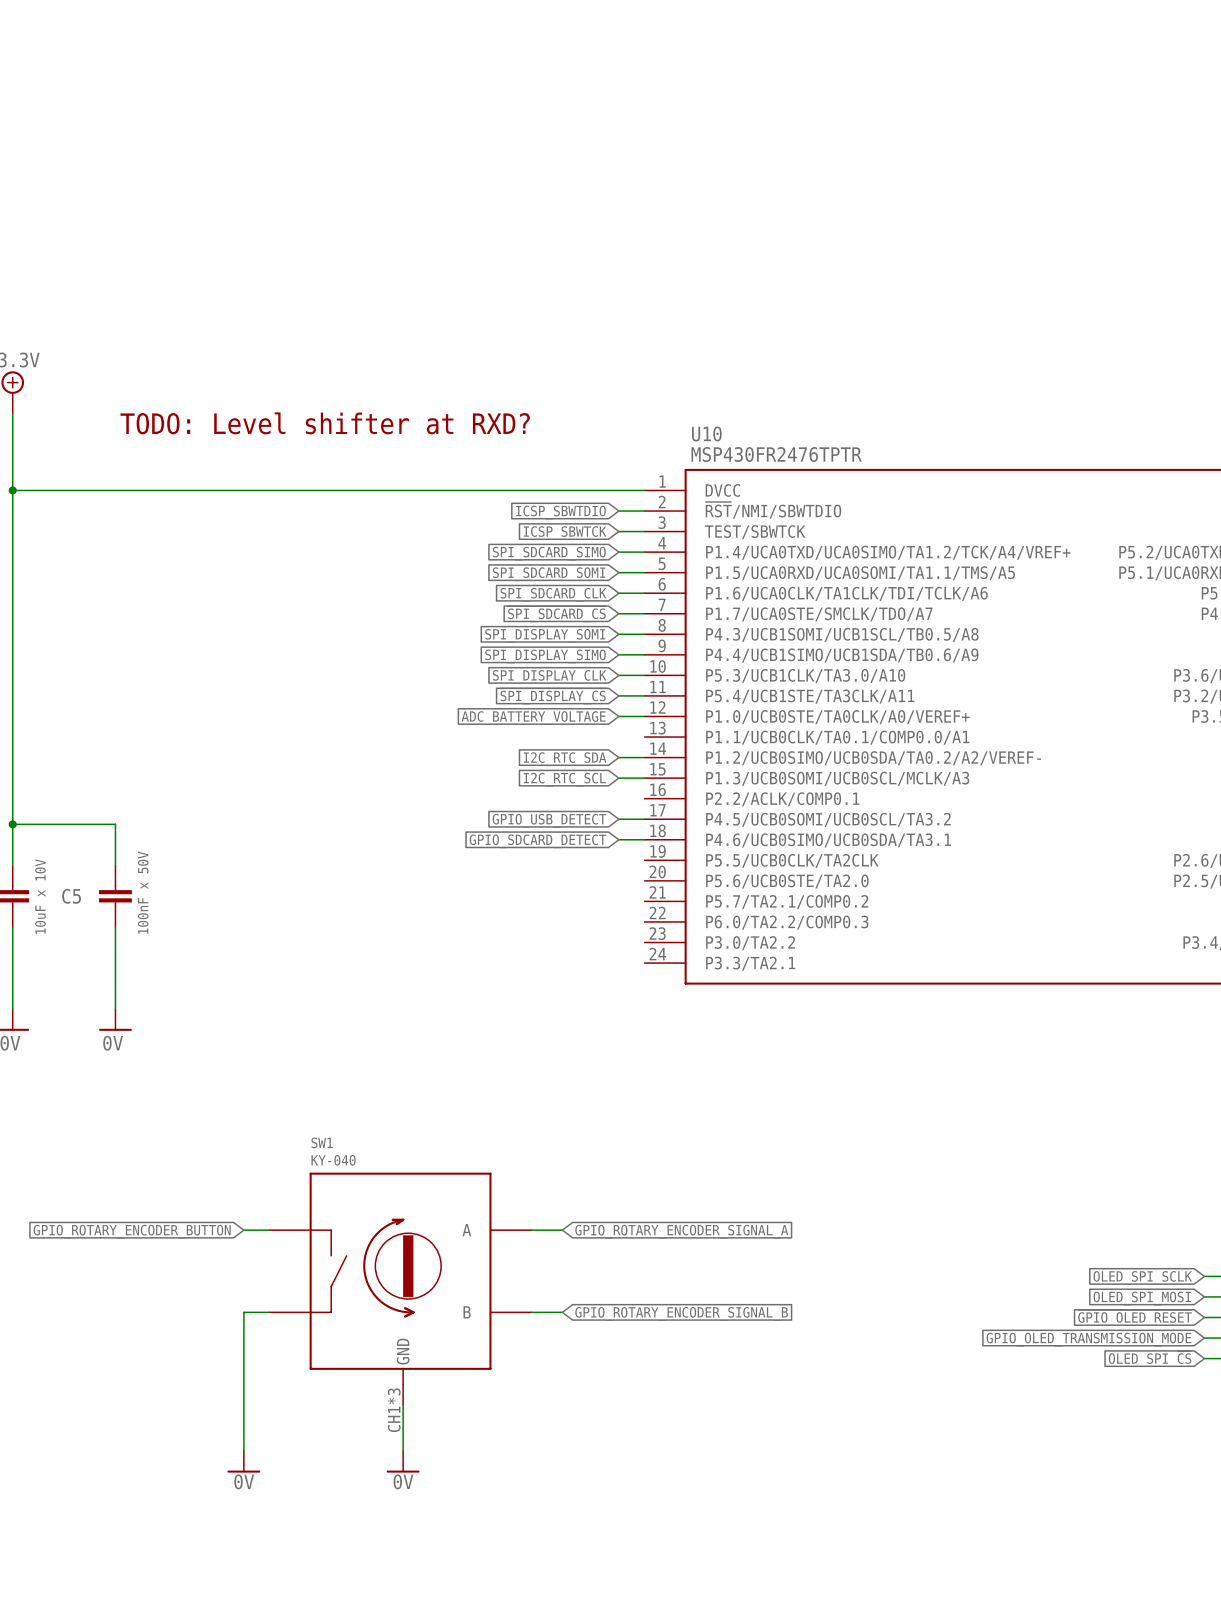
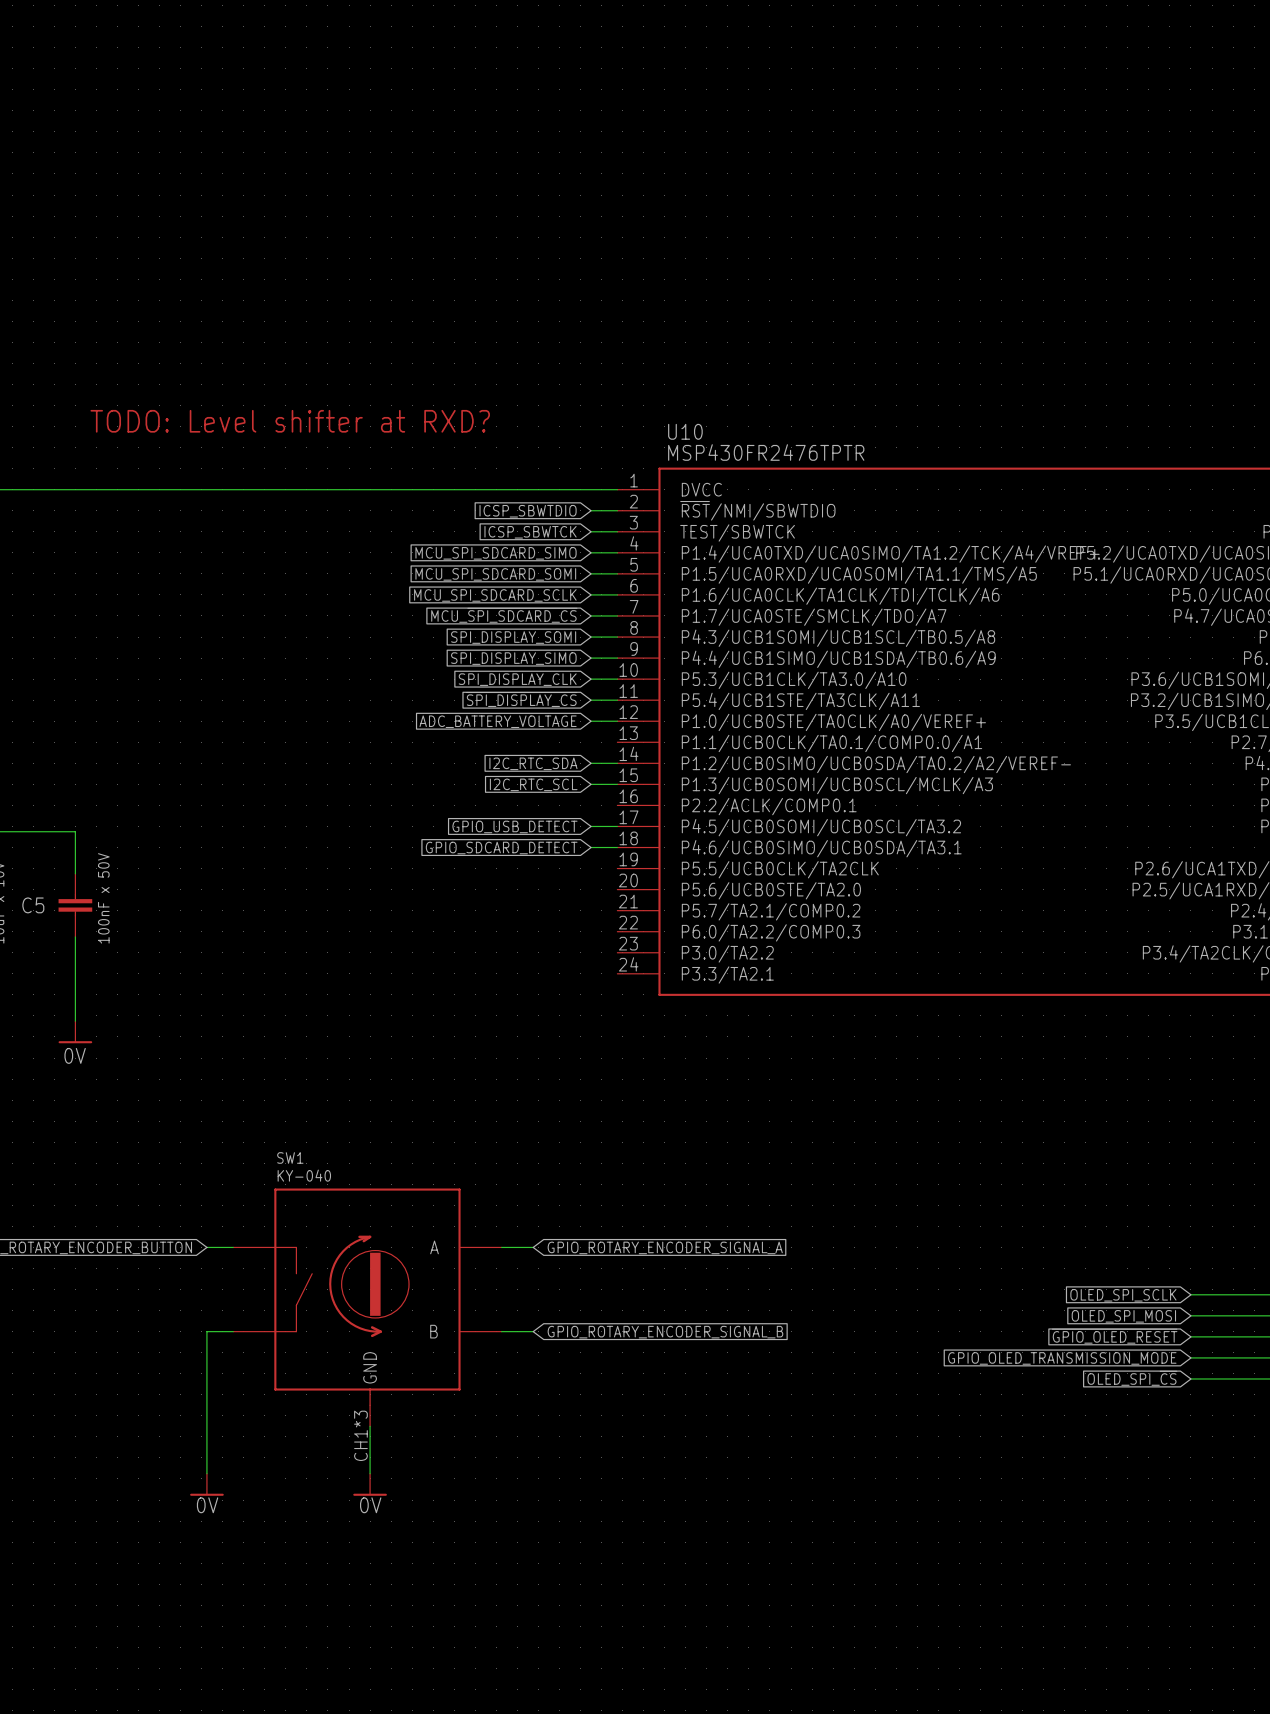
global label: SPI_SDCARD_SIMO (549, 553) -> MCU_SPI_SDCARD_SIMO (496, 553)
global label: SPI_SDCARD_SOMI (549, 574) -> MCU_SPI_SDCARD_SOMI (495, 574)
global label: SPI_SDCARD_CLK (553, 594) -> MCU_SPI_SDCARD_SCLK (495, 595)
global label: ~{SPI_SDCARD_CS} (556, 614) -> MCU_~{SPI_SDCARD_CS} (504, 615)

